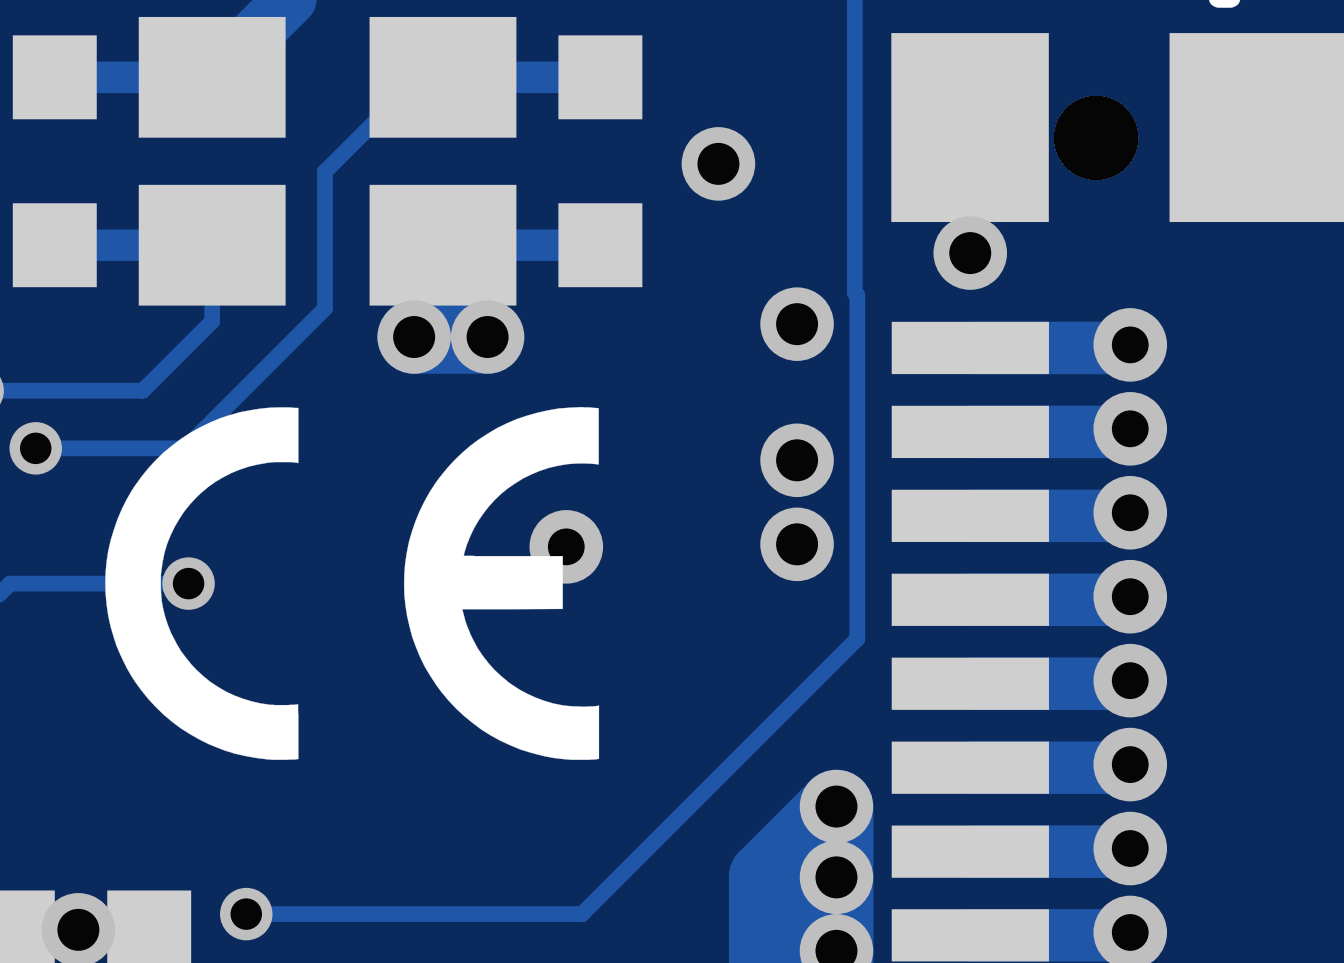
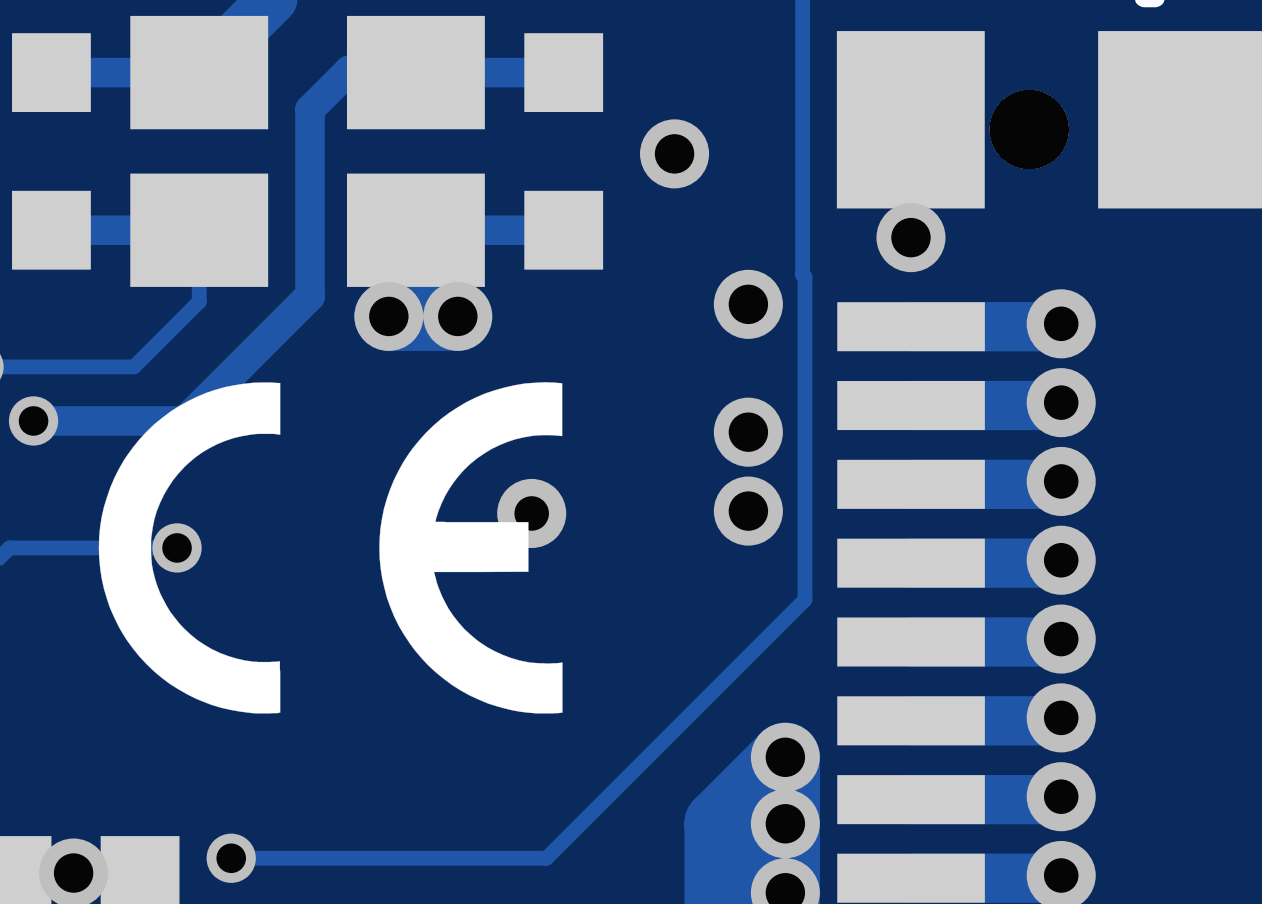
track: none -> (408, 70) (349, 70) (310, 109) (310, 296) (185, 420) (33, 420)
track: (443, 77) (419, 77) (324, 171) (324, 308) -> none

